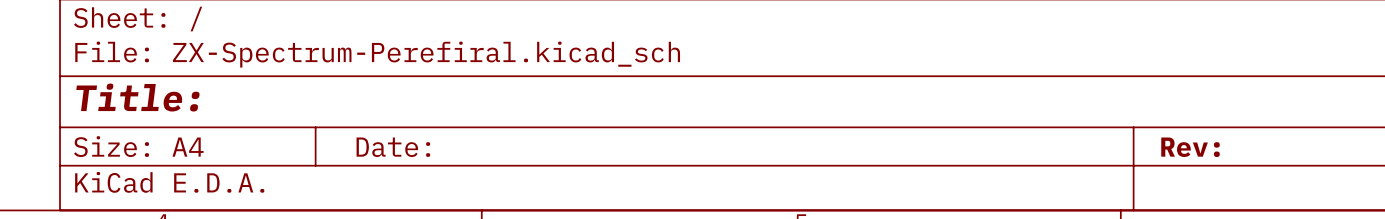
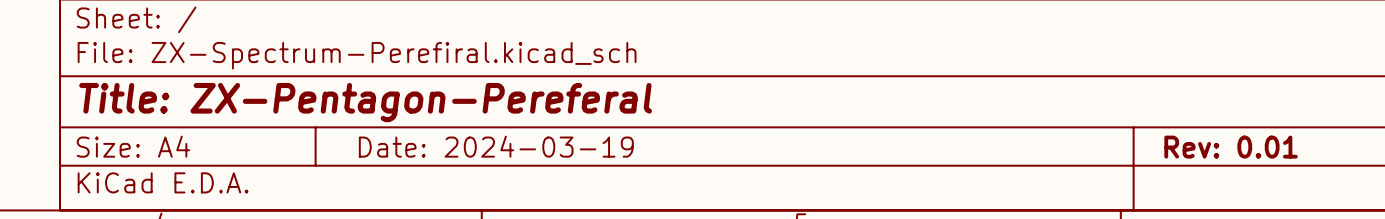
title block: Title: (137, 97) -> Title: ZX-Pentagon-Pereferal (365, 102)
title block: Date: (393, 147) -> Date: 2024-03-19 (496, 146)
title block: Rev: (1190, 147) -> Rev: 0.01 (1231, 147)

